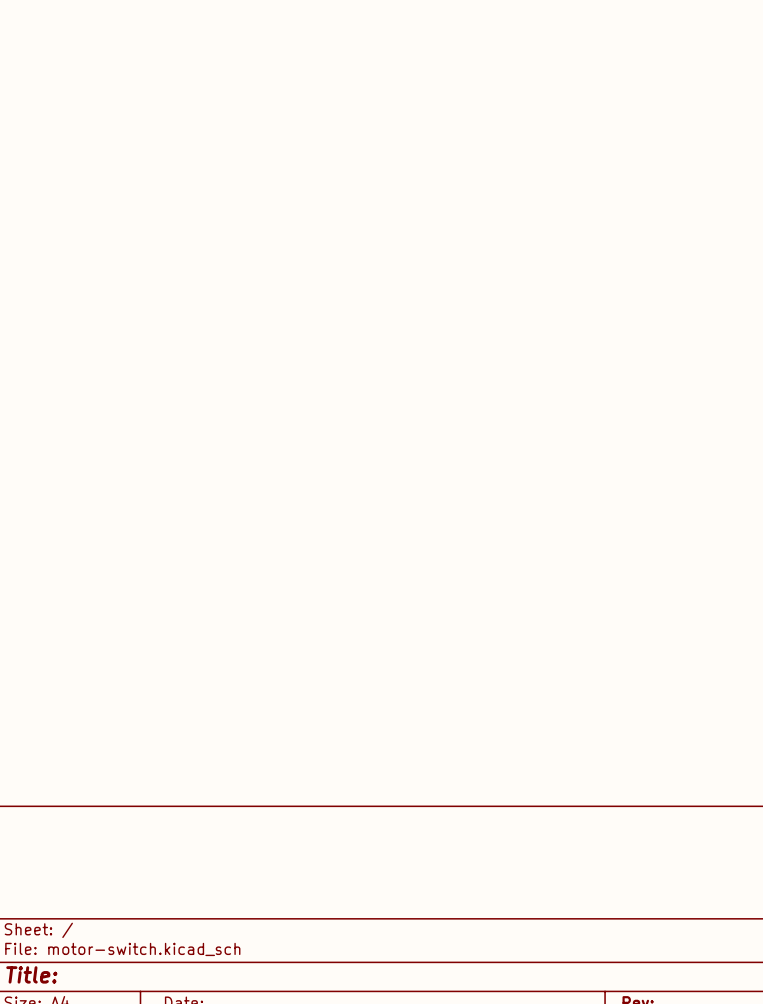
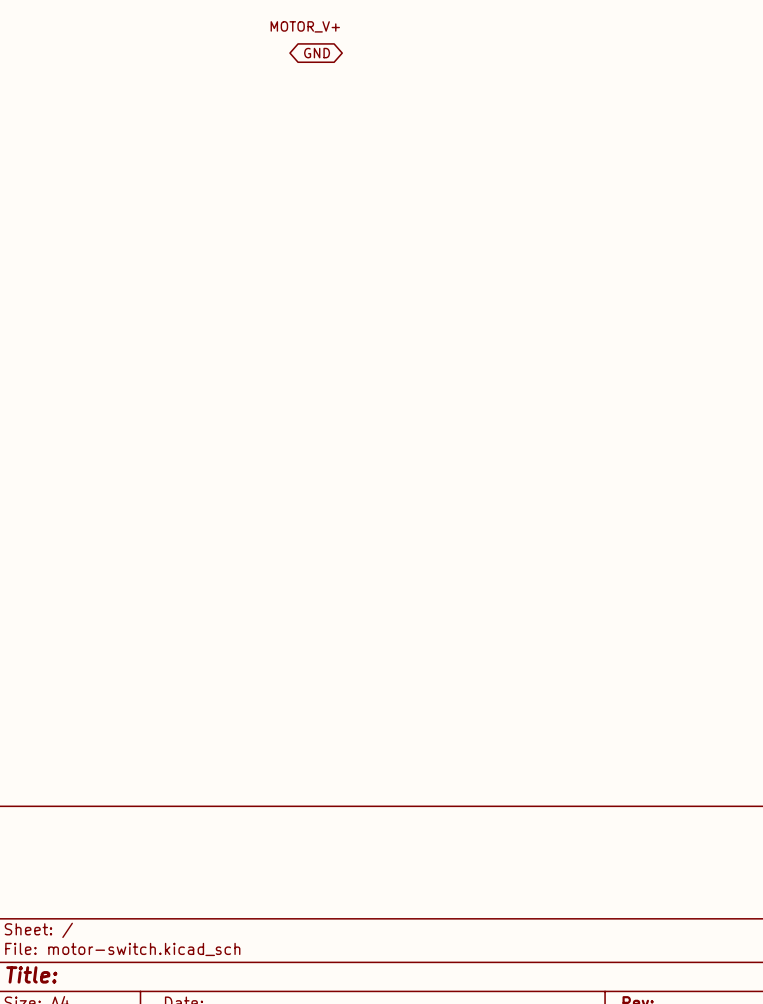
label: none -> MOTOR_V+ (305, 26)
global label: none -> GND (317, 53)

